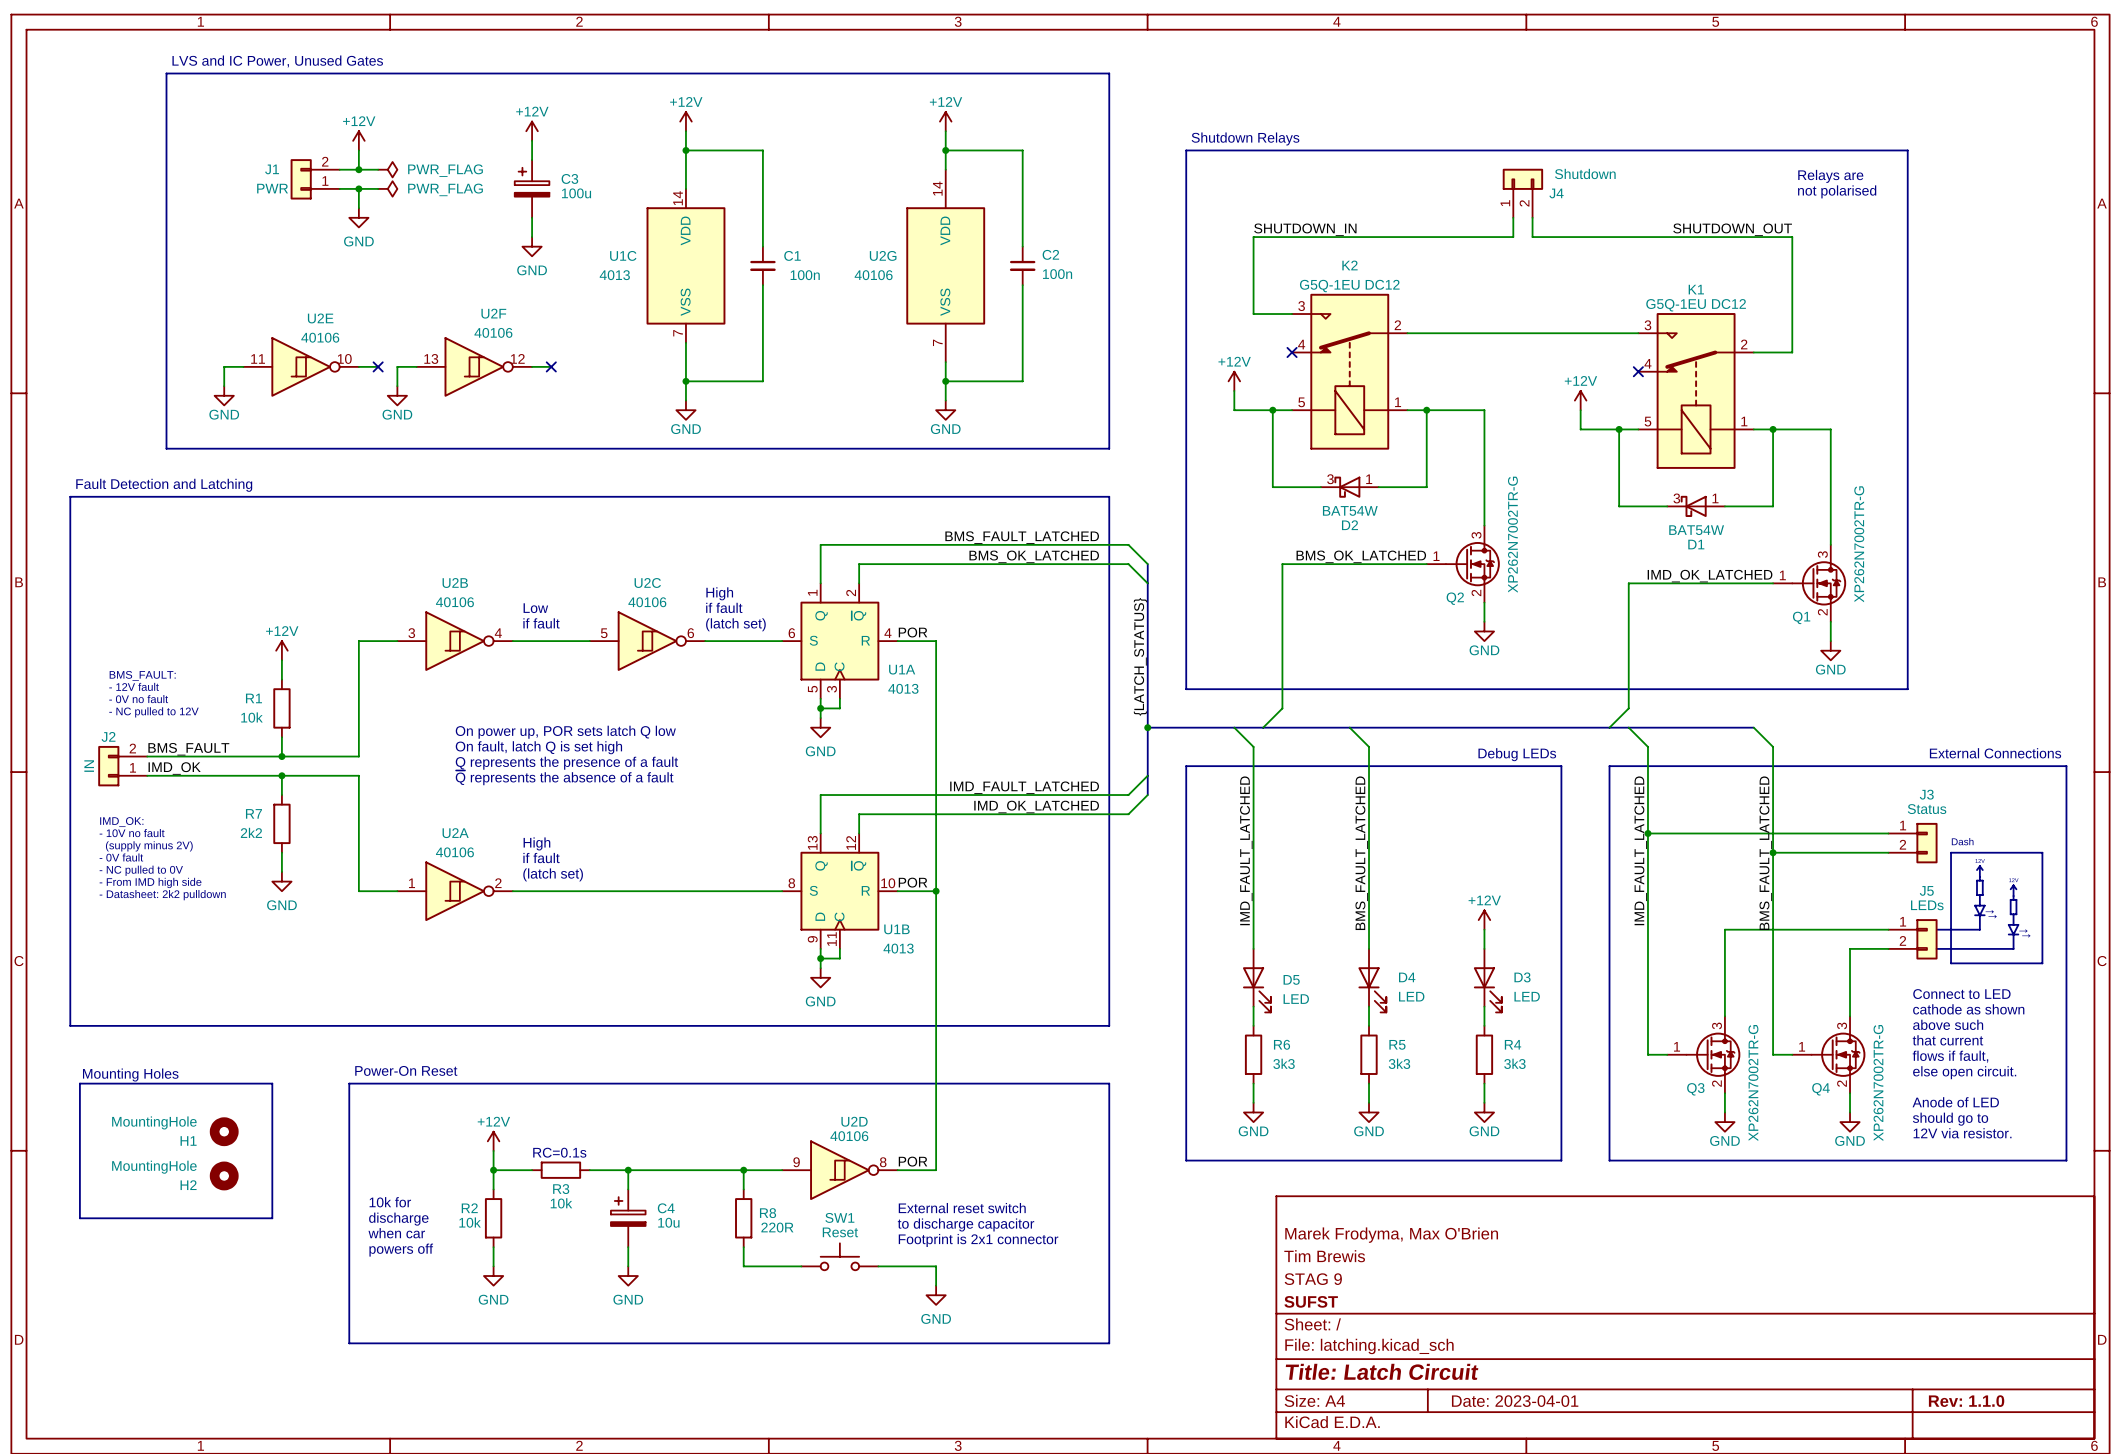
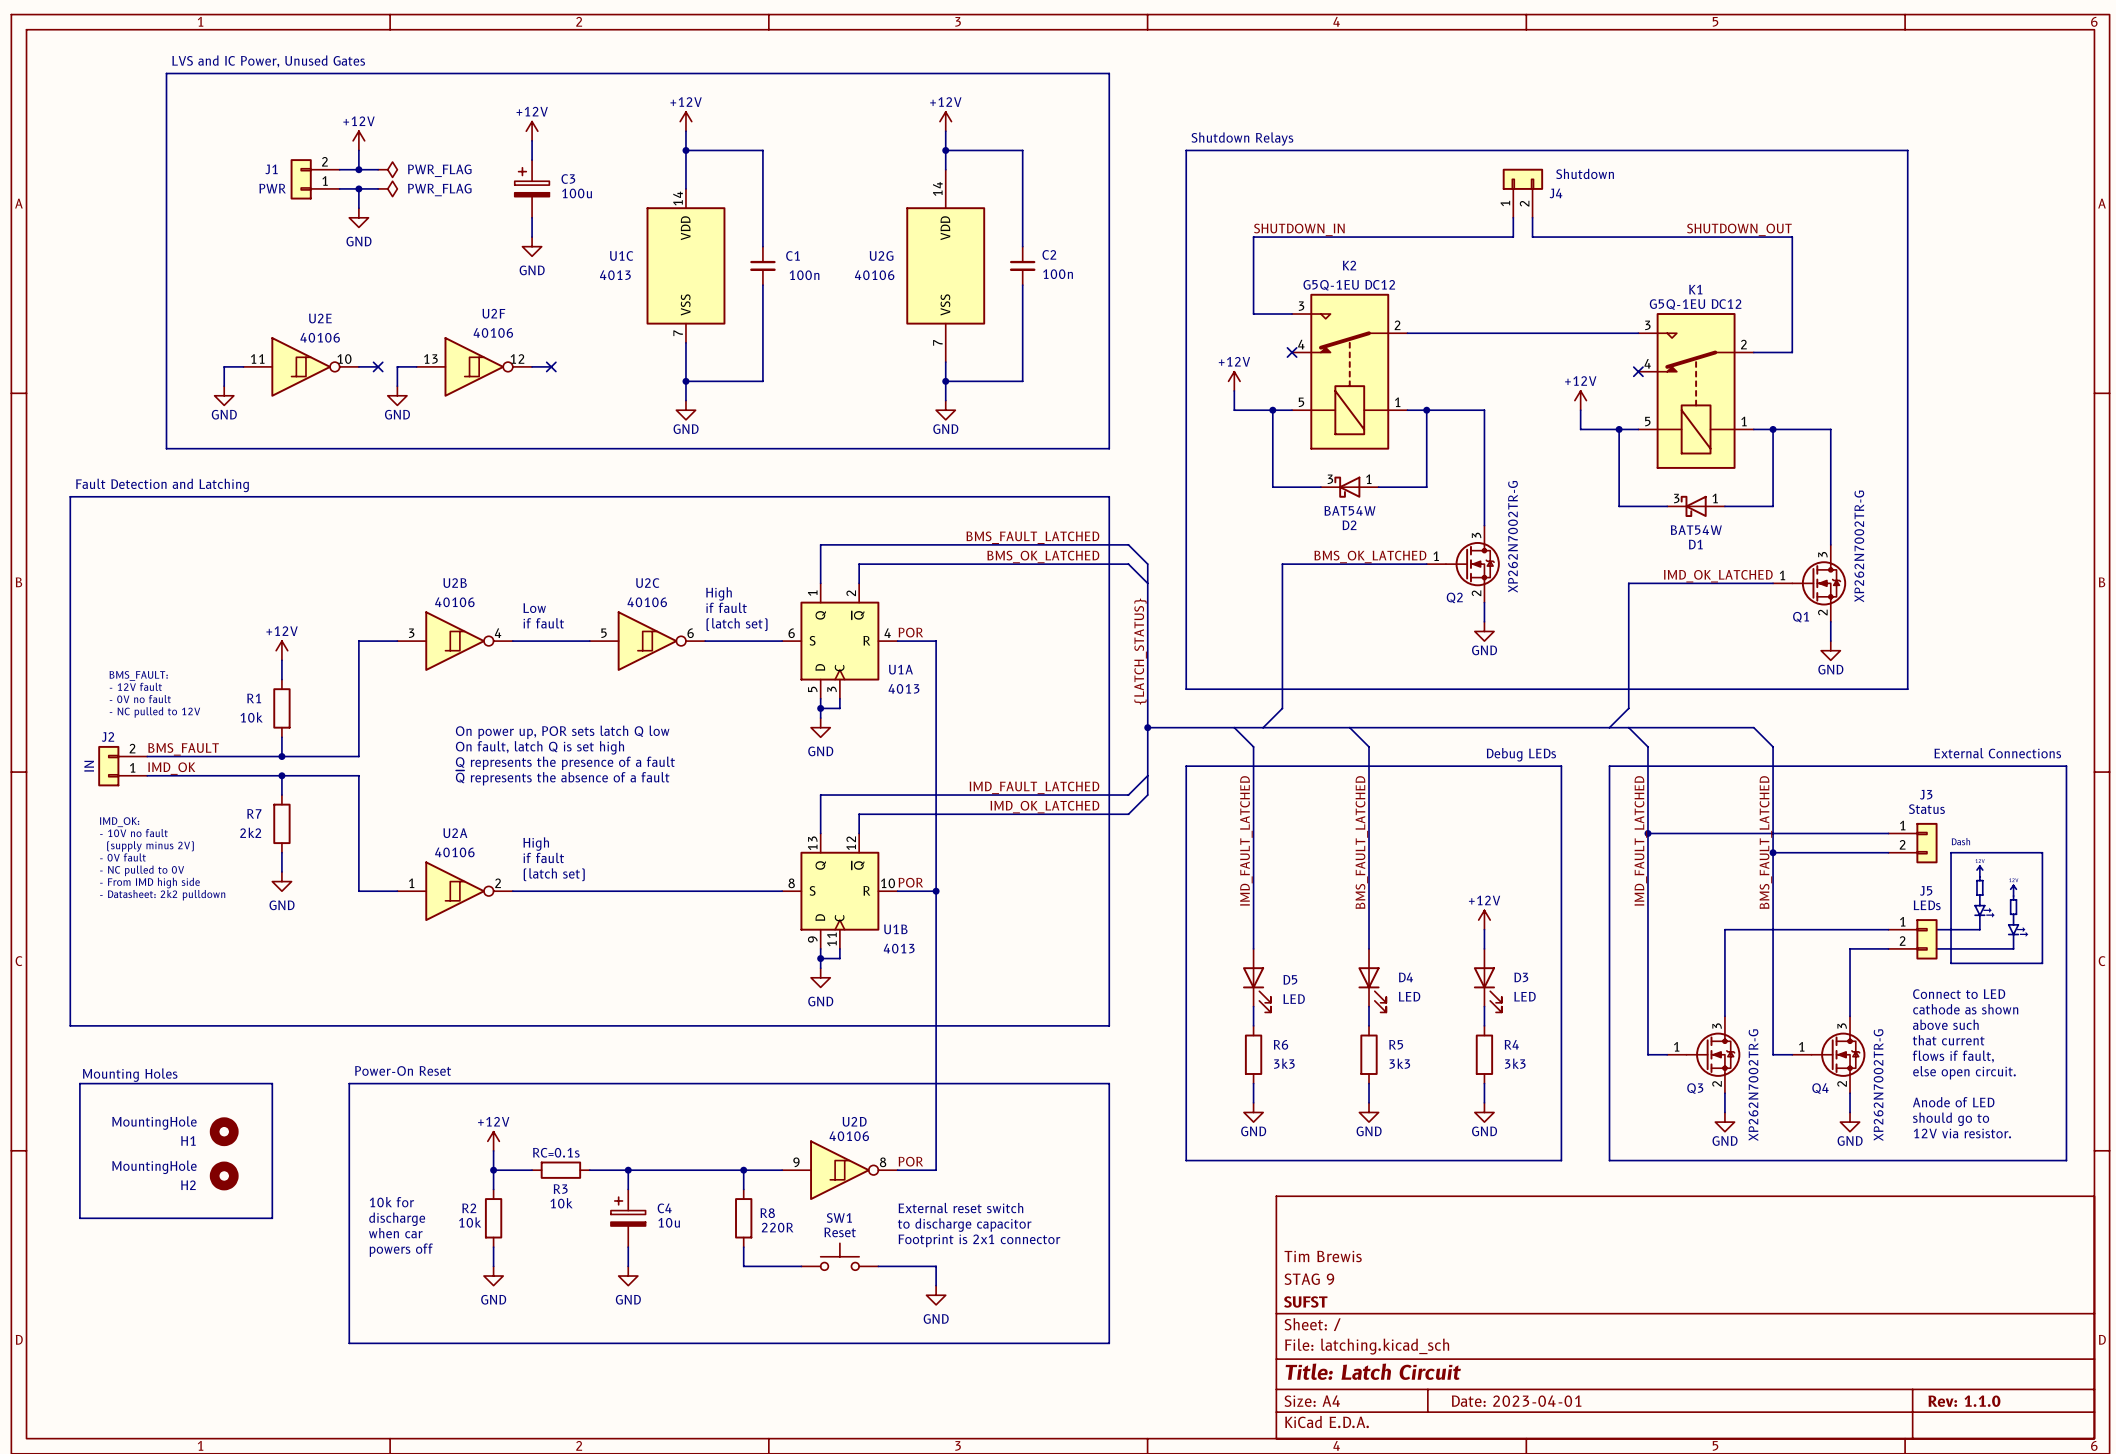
text: Relays are (1830, 176) -> none
text: not polarised (1837, 191) -> none
title block: Marek Frodyma, Max O'Brien (1391, 1235) -> none

